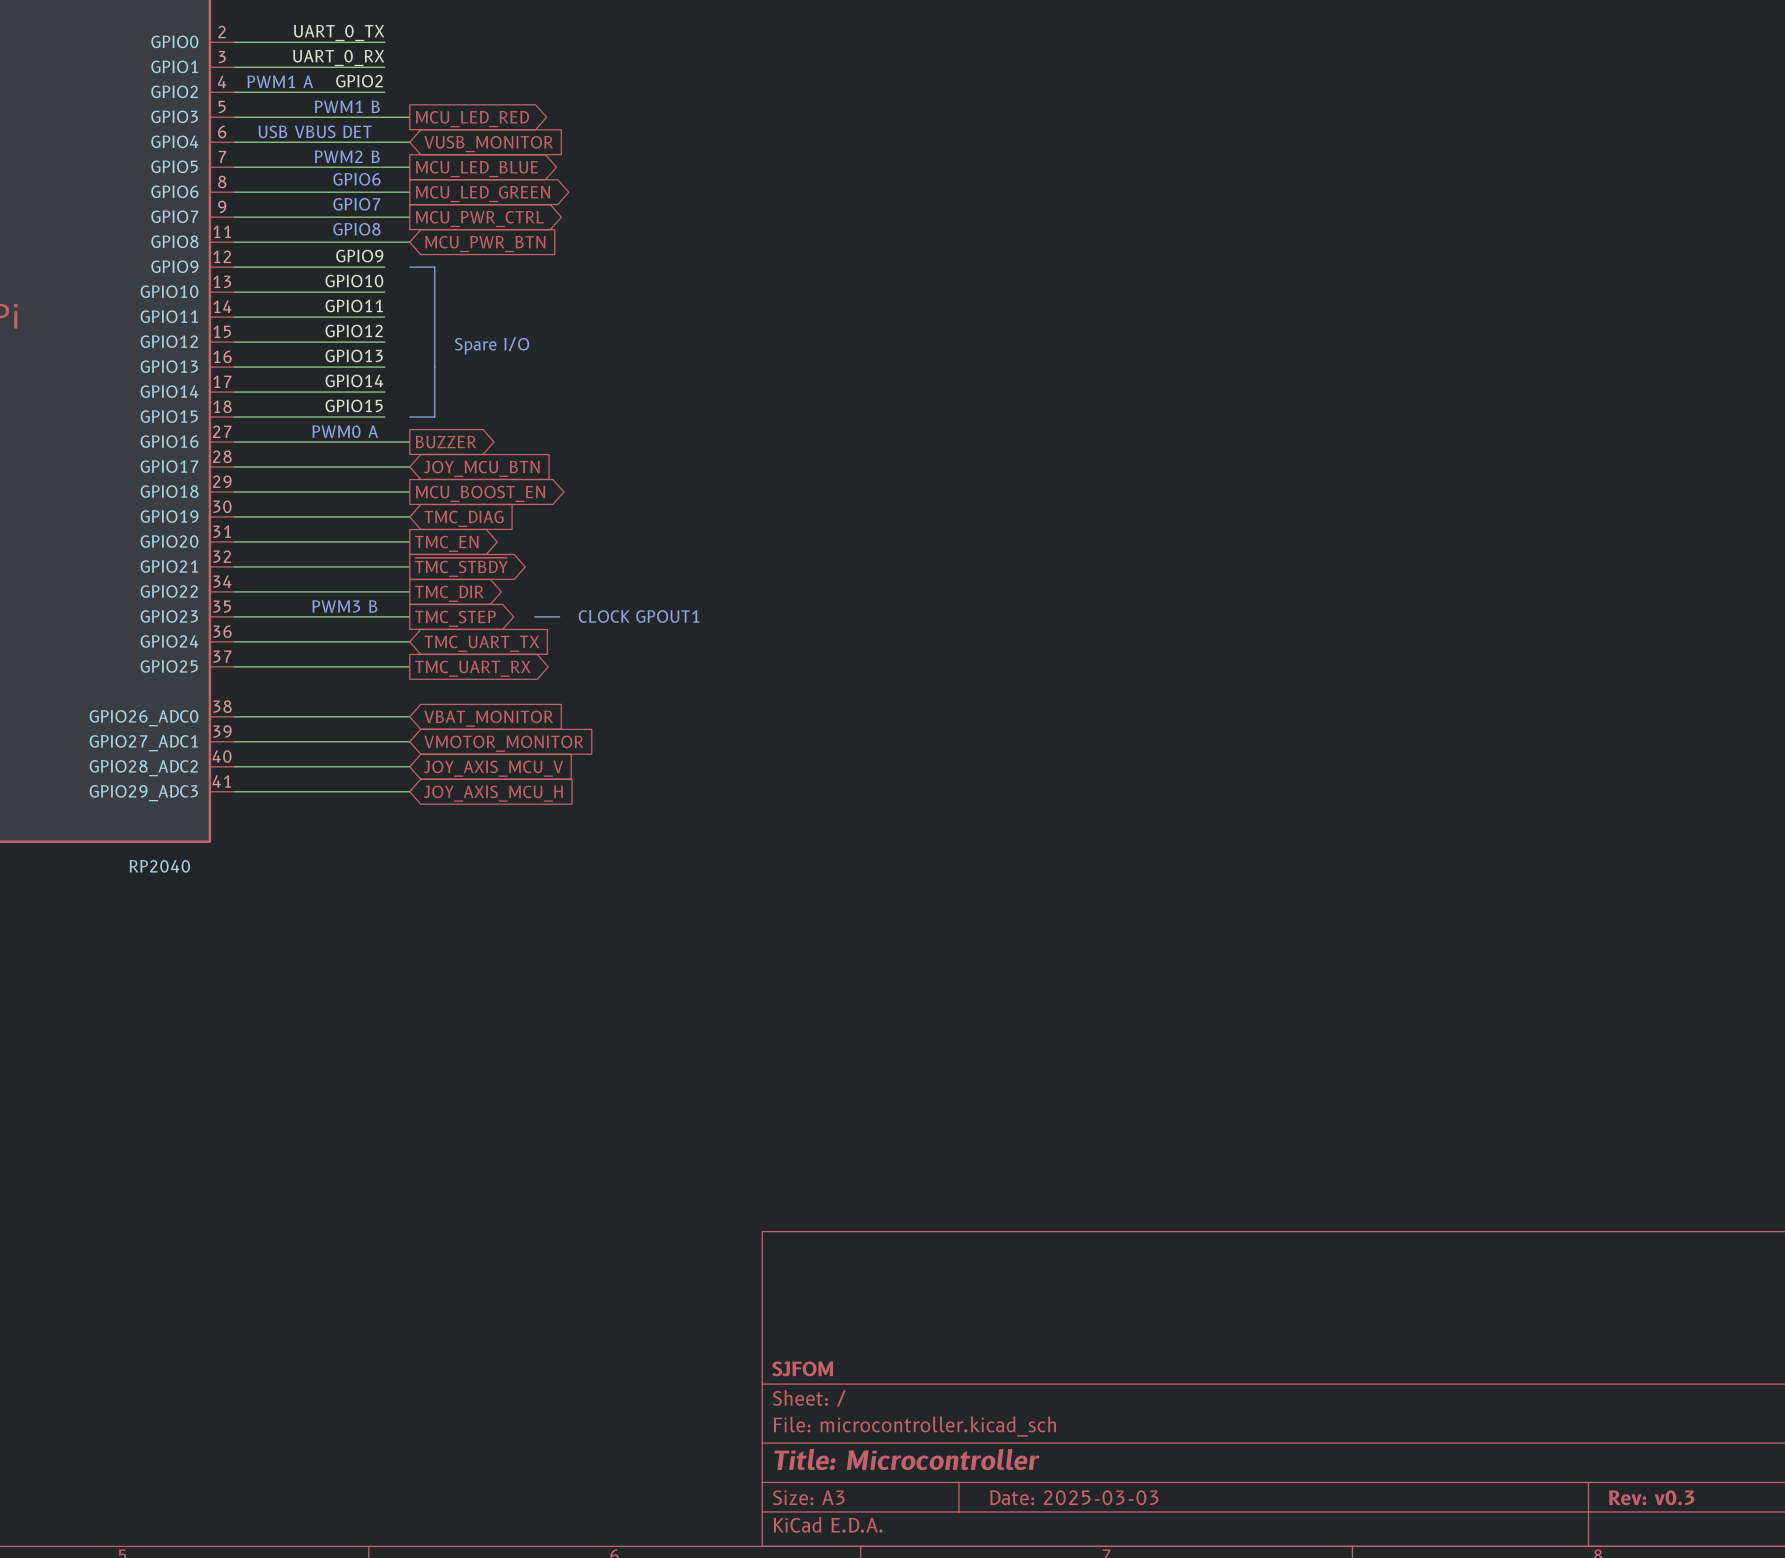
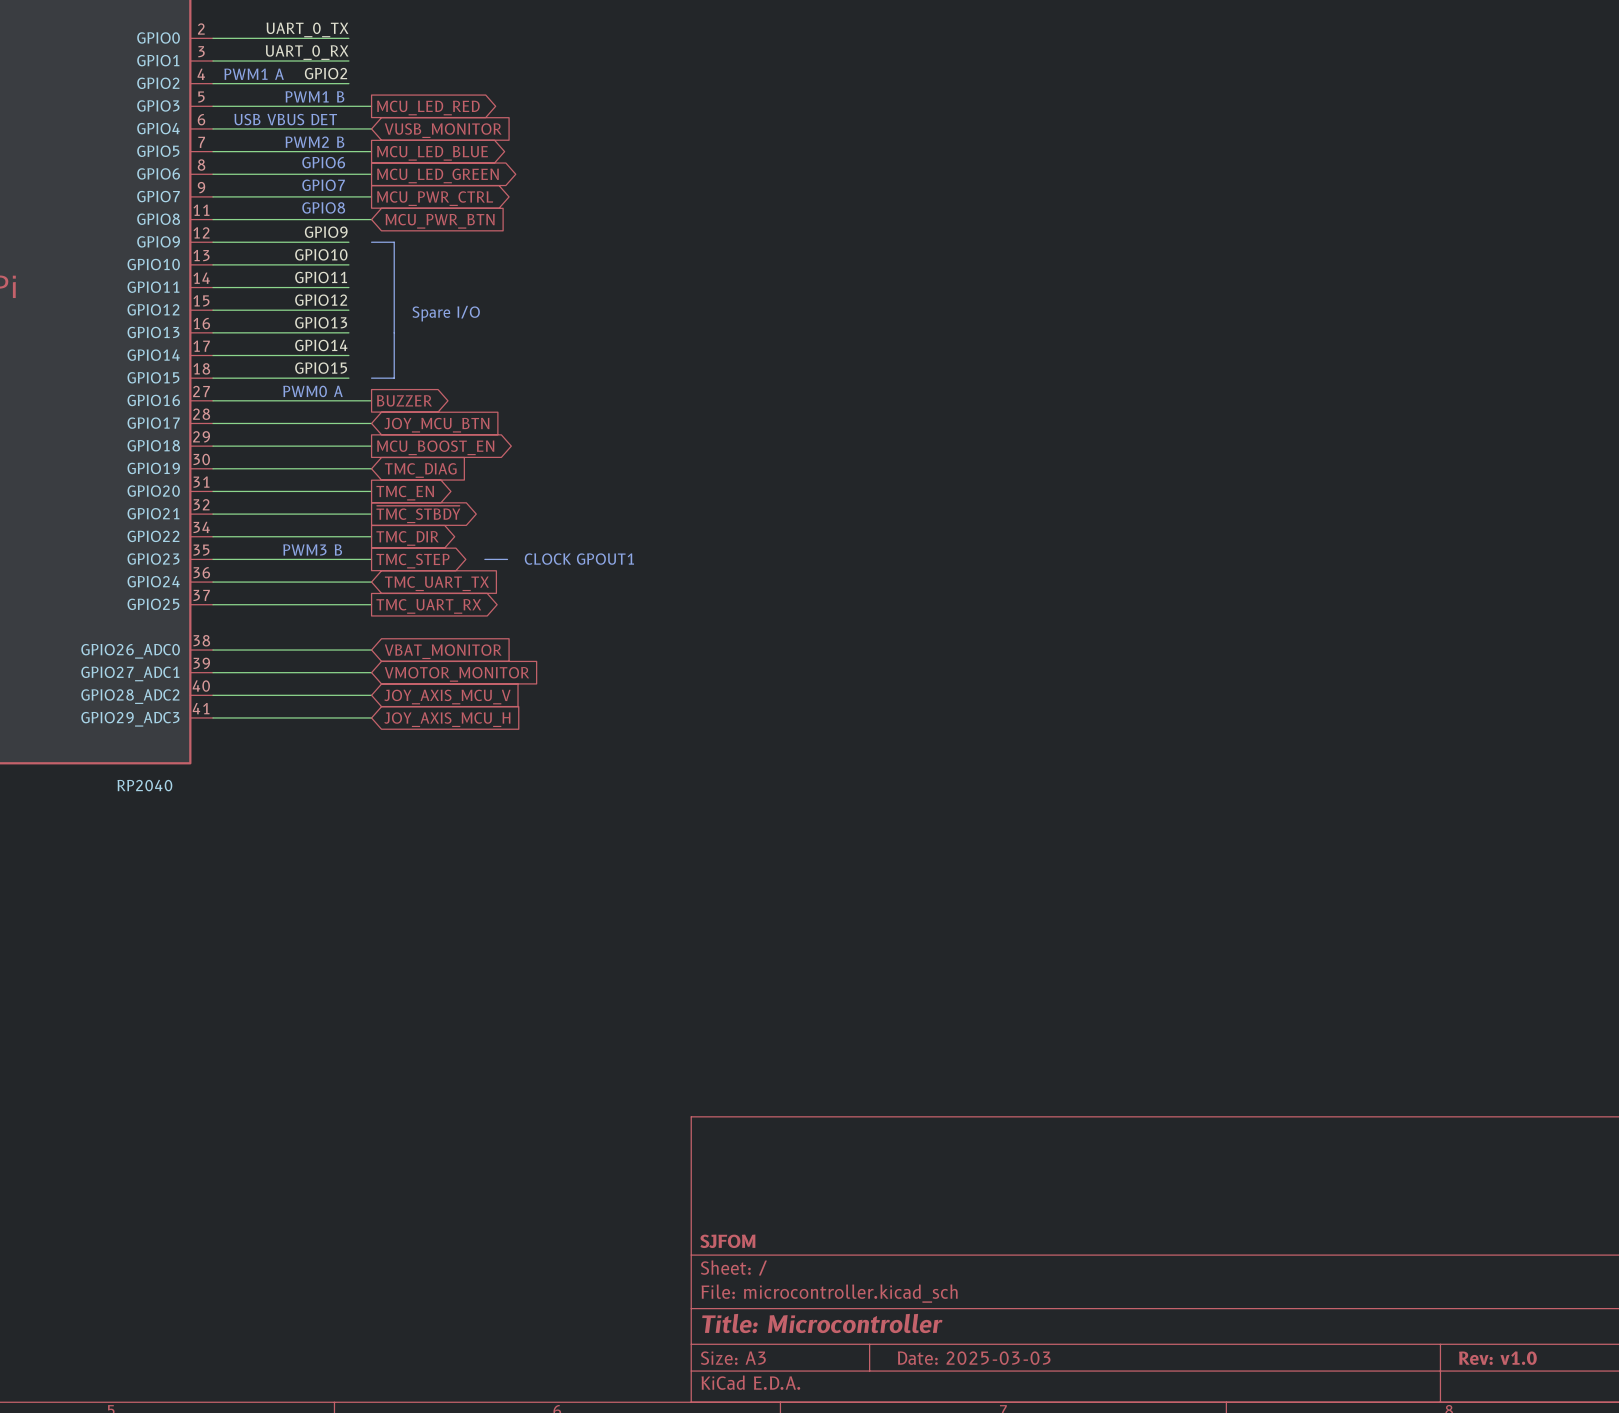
title block: Rev: v0.3 (1651, 1497) -> Rev: v1.0 (1497, 1358)

